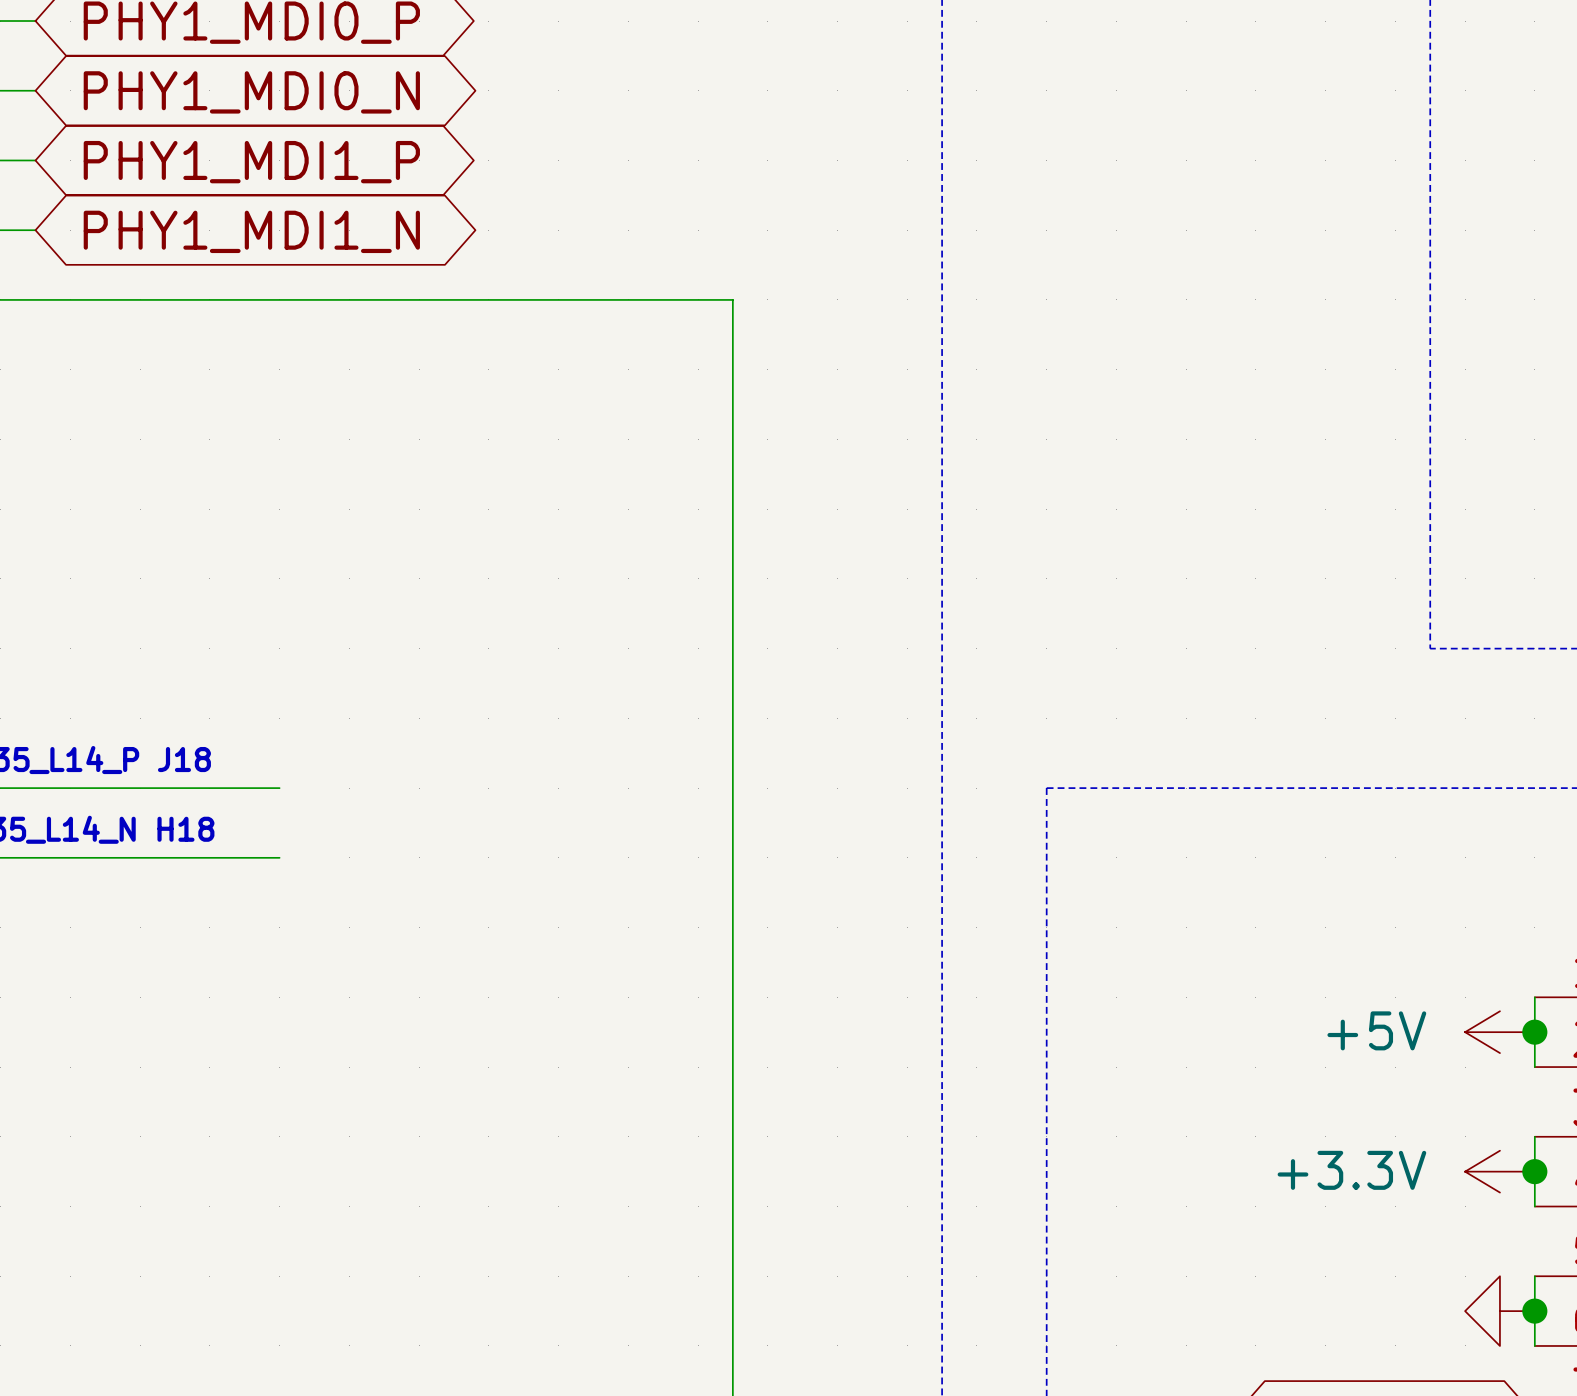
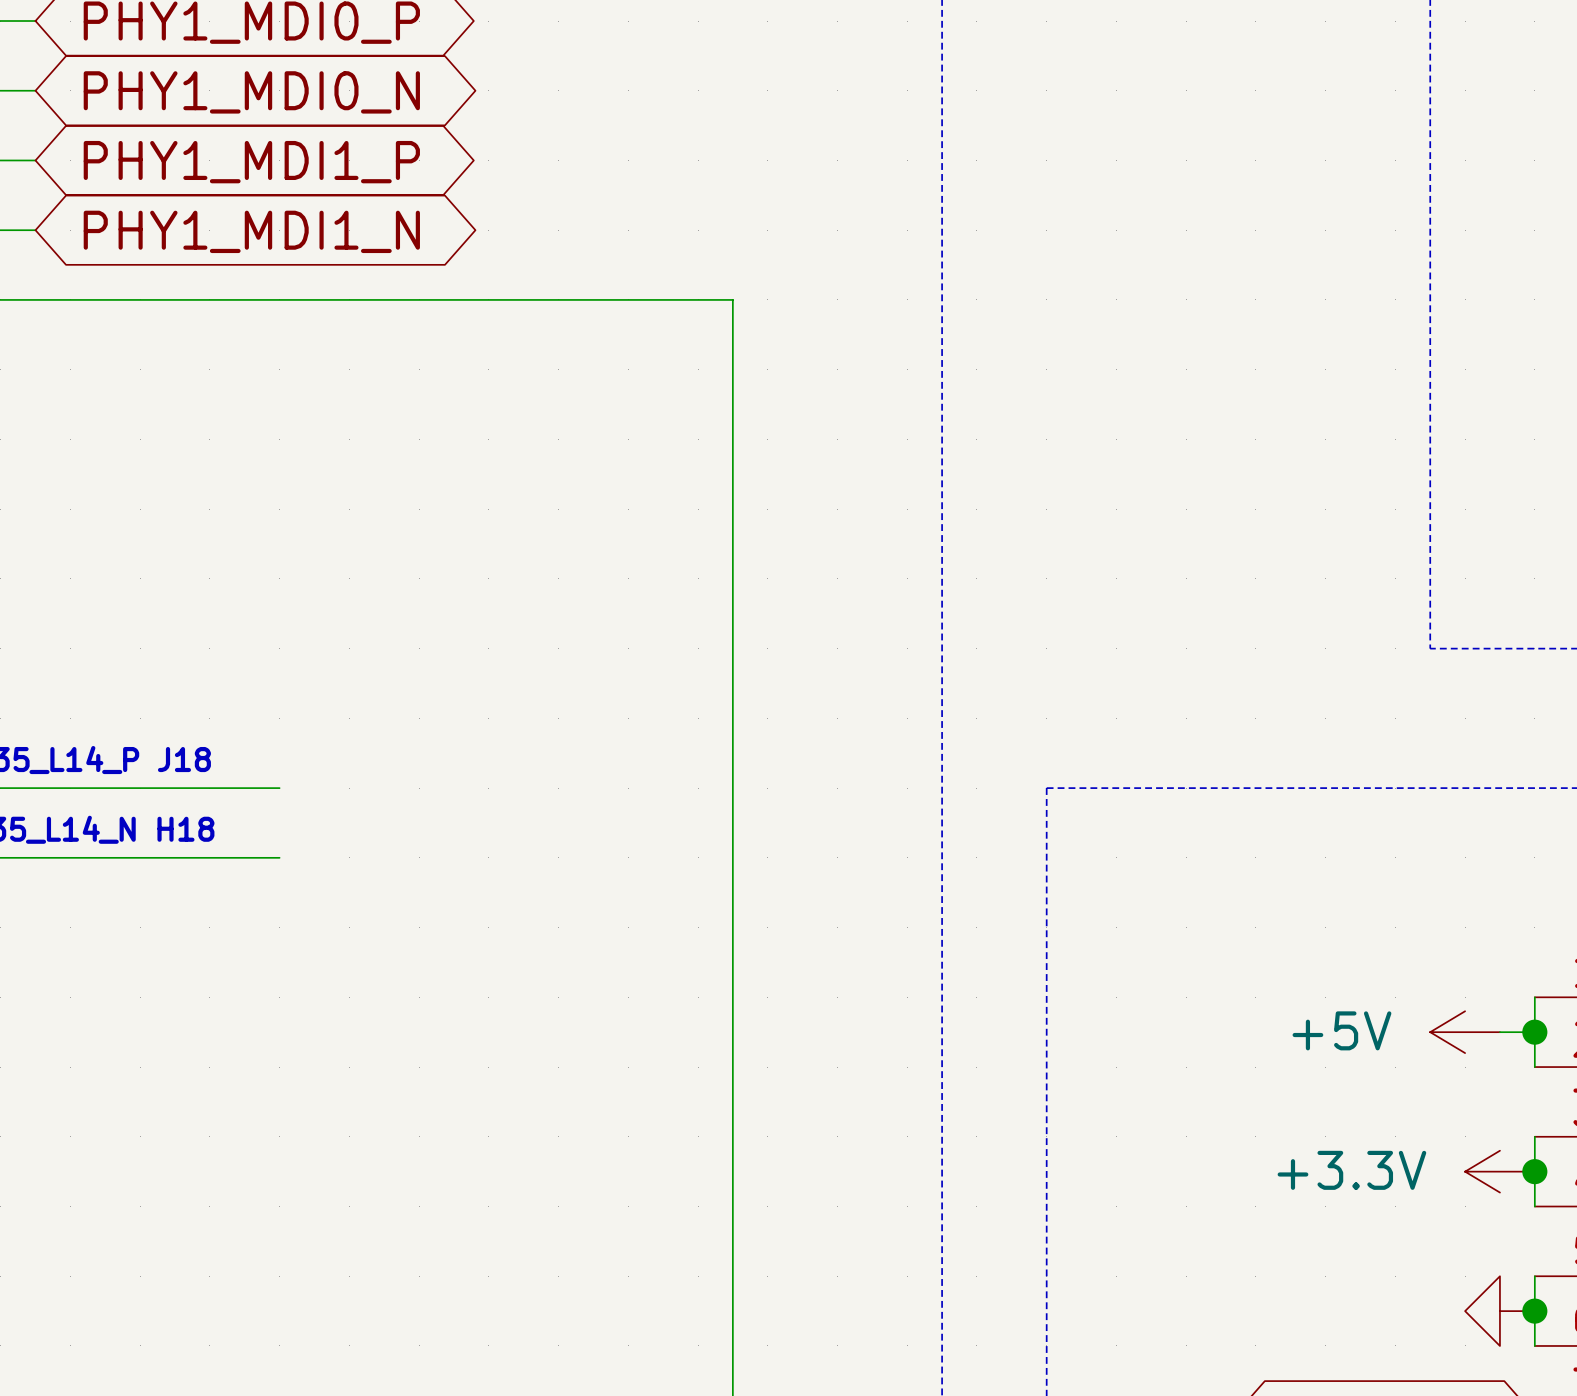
power symbol position: +5V (1499, 1032) -> +5V (1465, 1032)

